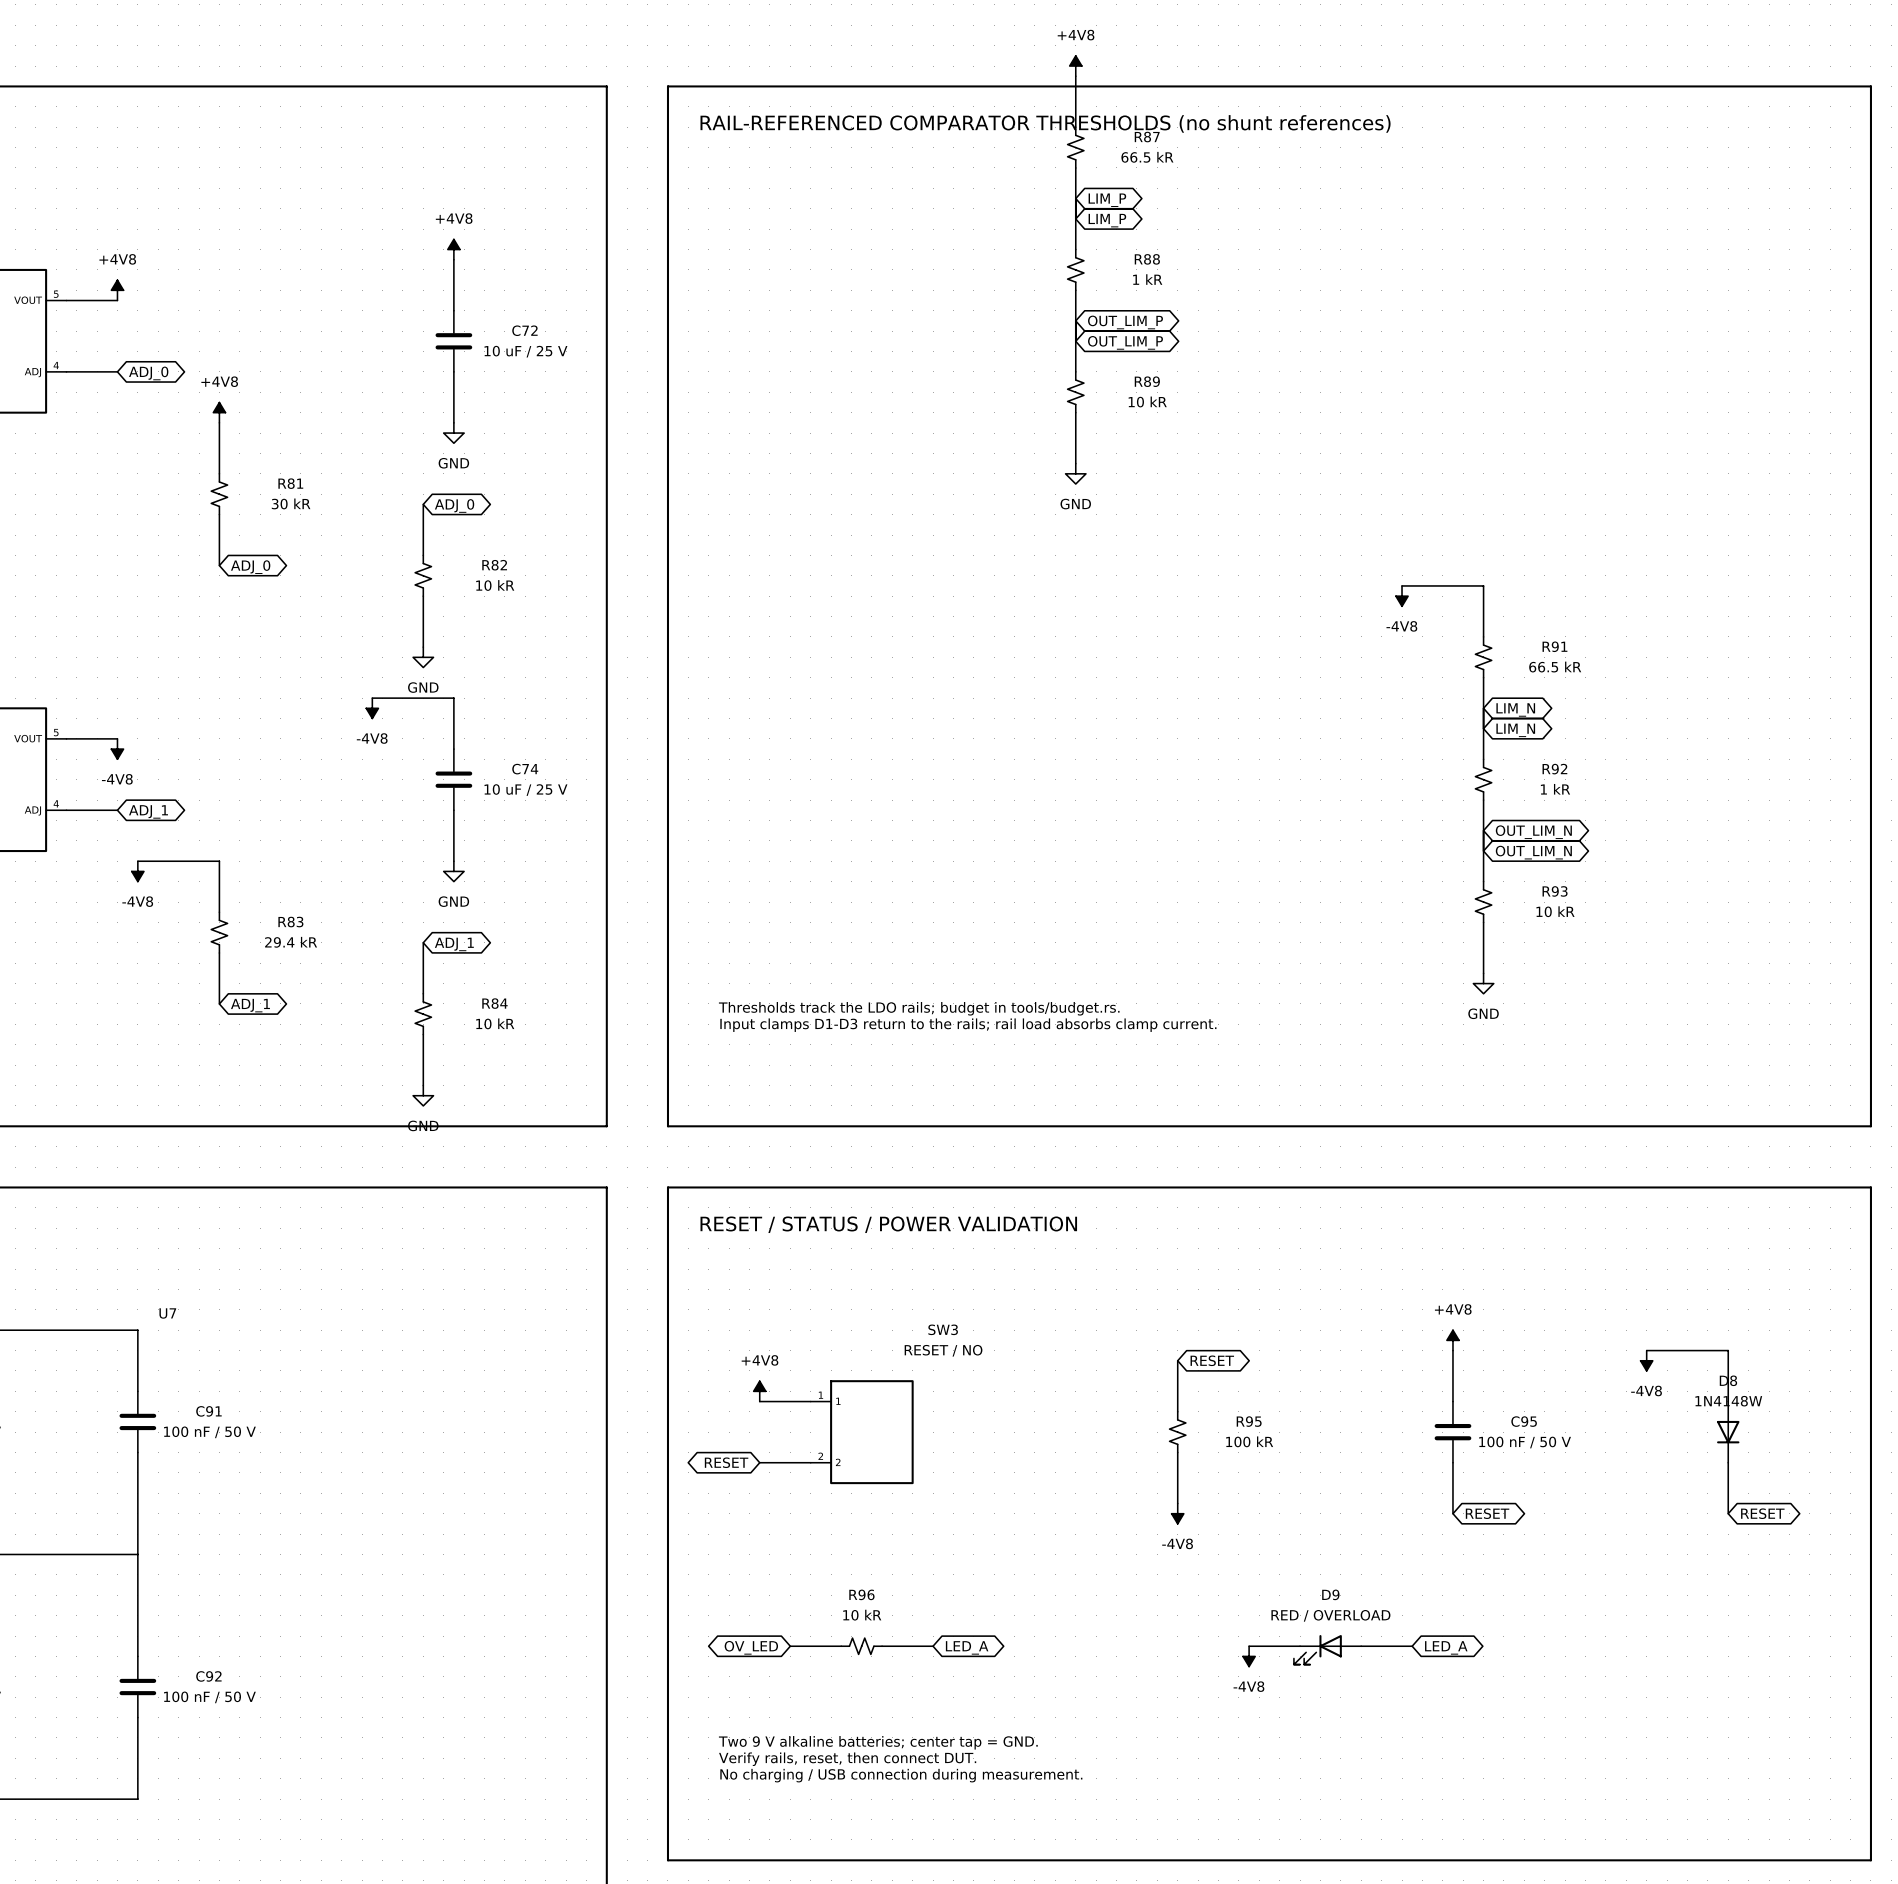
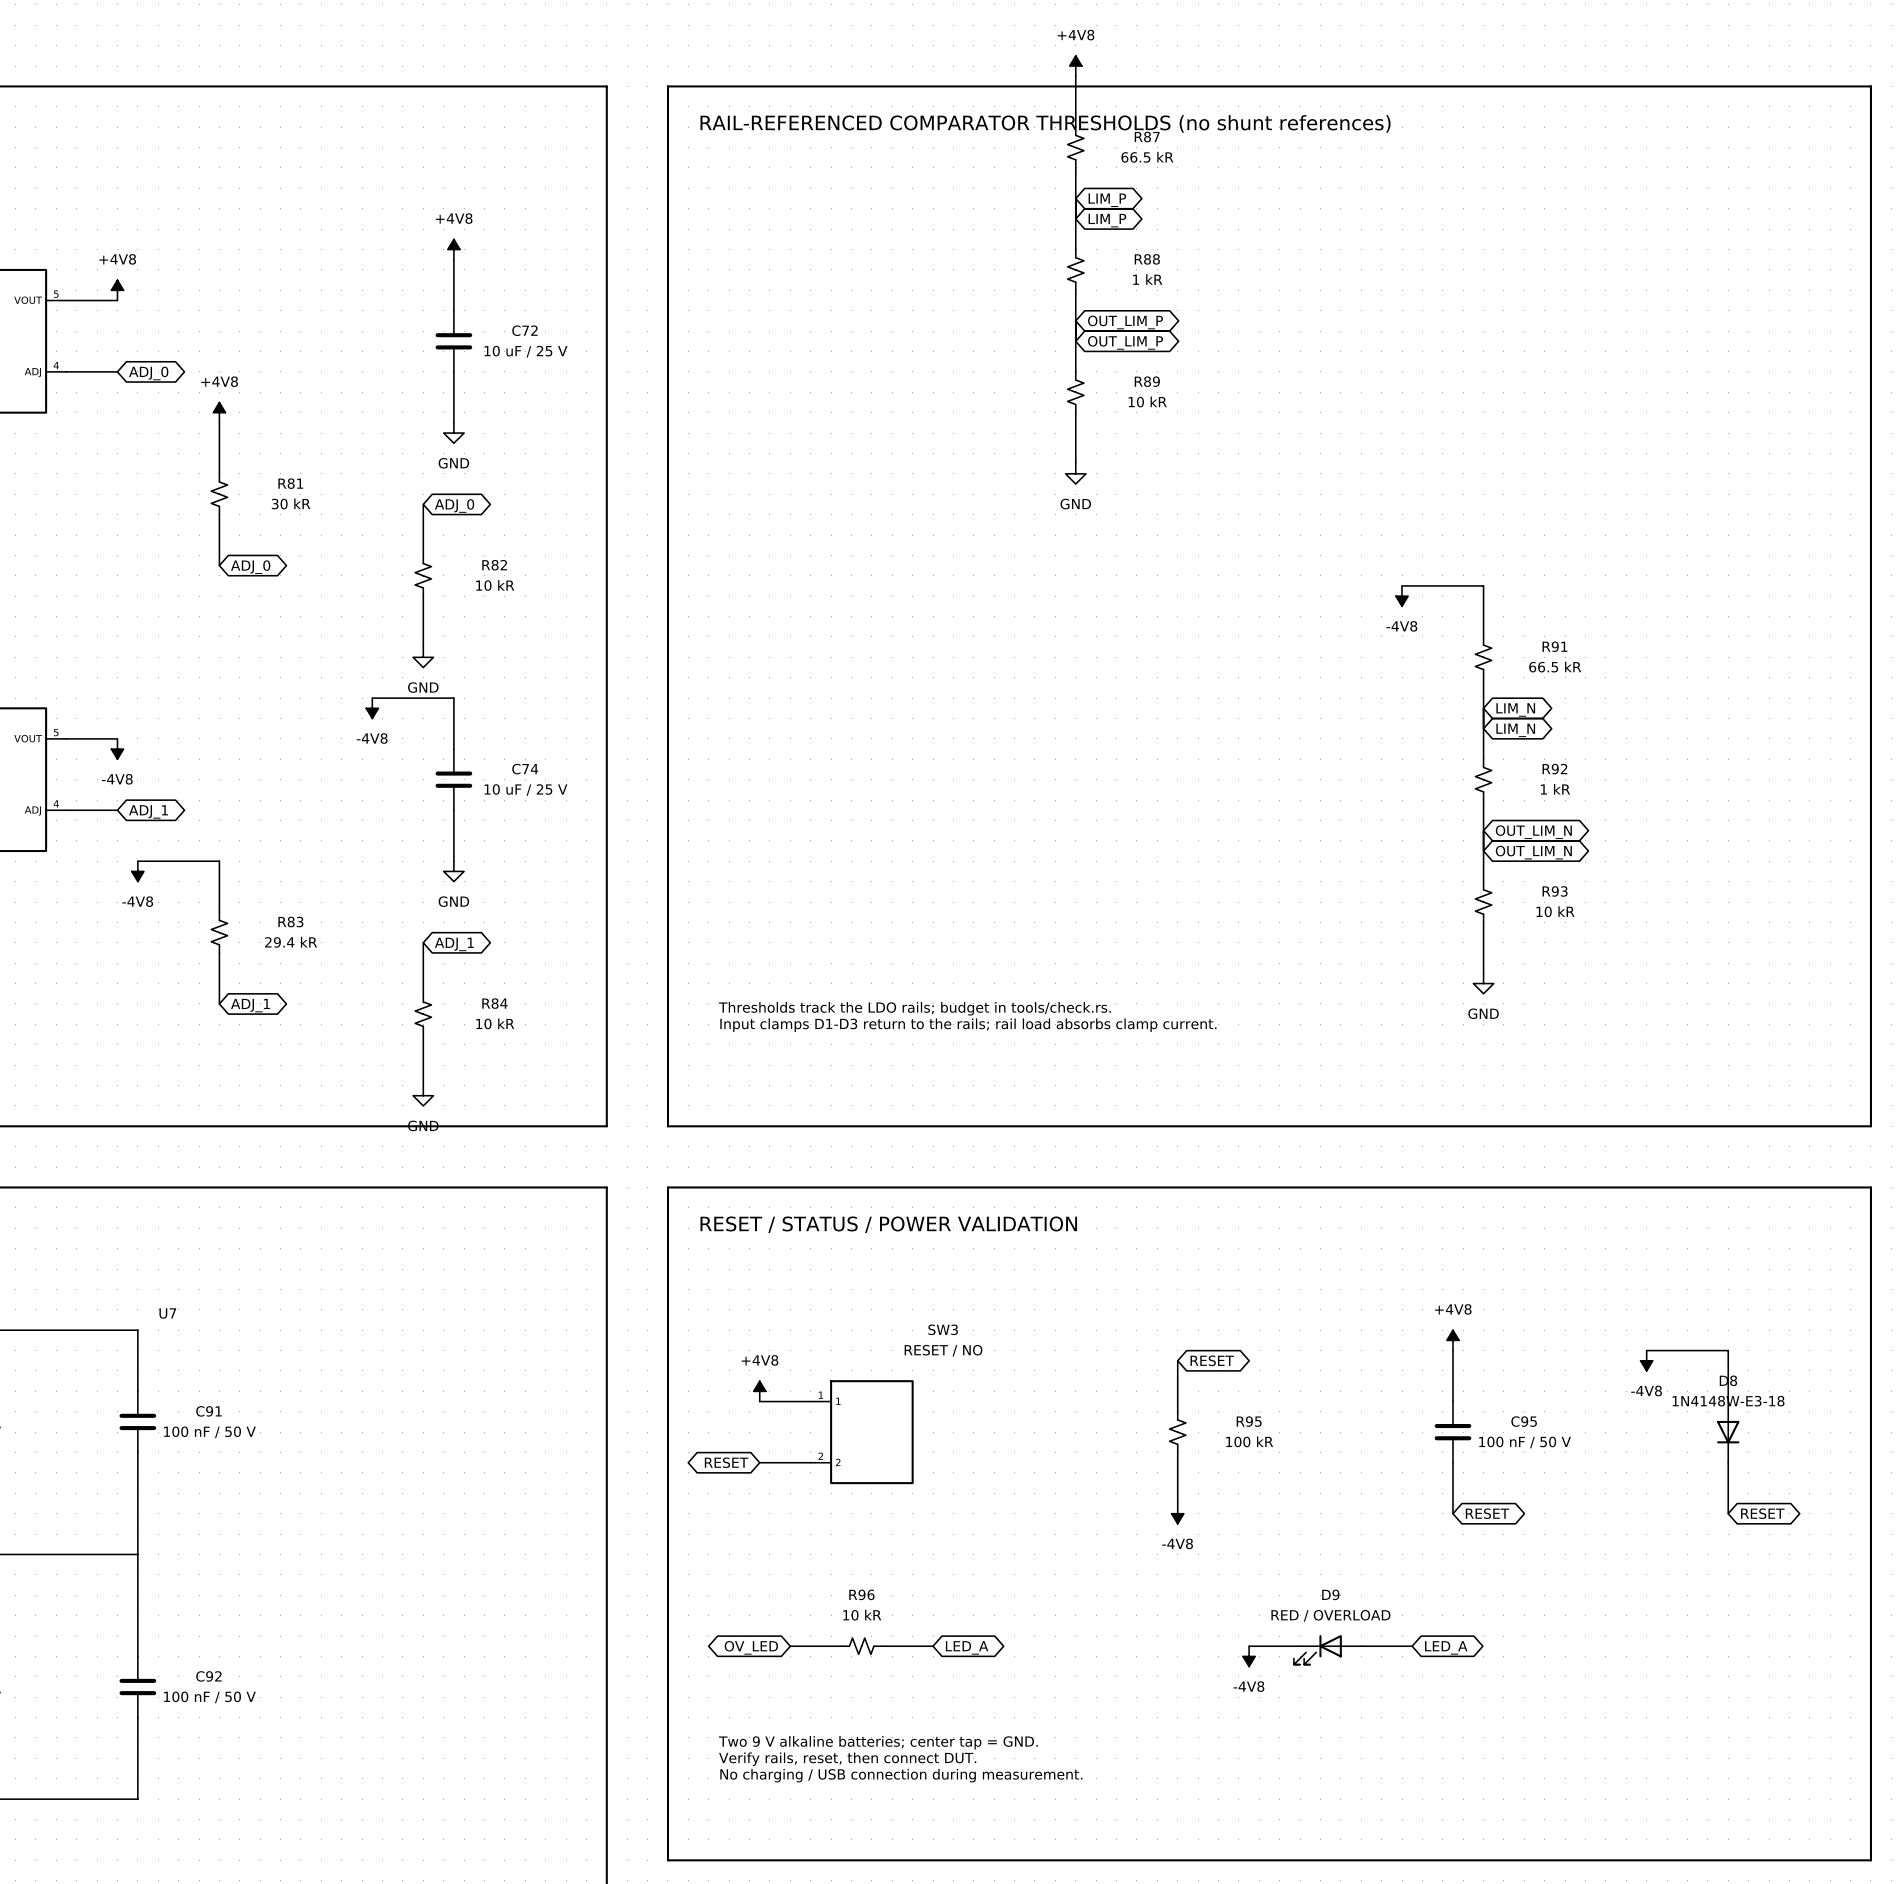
text: Thresholds track the LDO rails; budget in tools/budget.rs. (919, 1008) -> Thresholds track the LDO rails; budget in tools/check.rs. (914, 1008)
D8 value: 1N4148W (1728, 1401) -> 1N4148W-E3-18 (1728, 1401)

